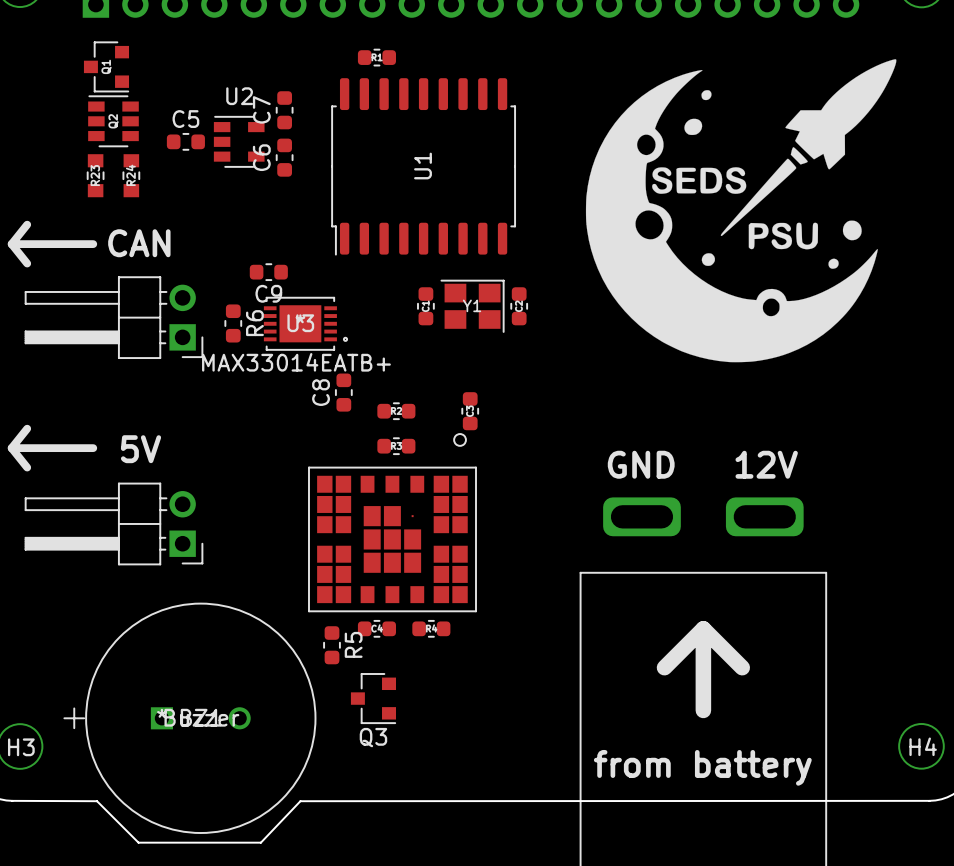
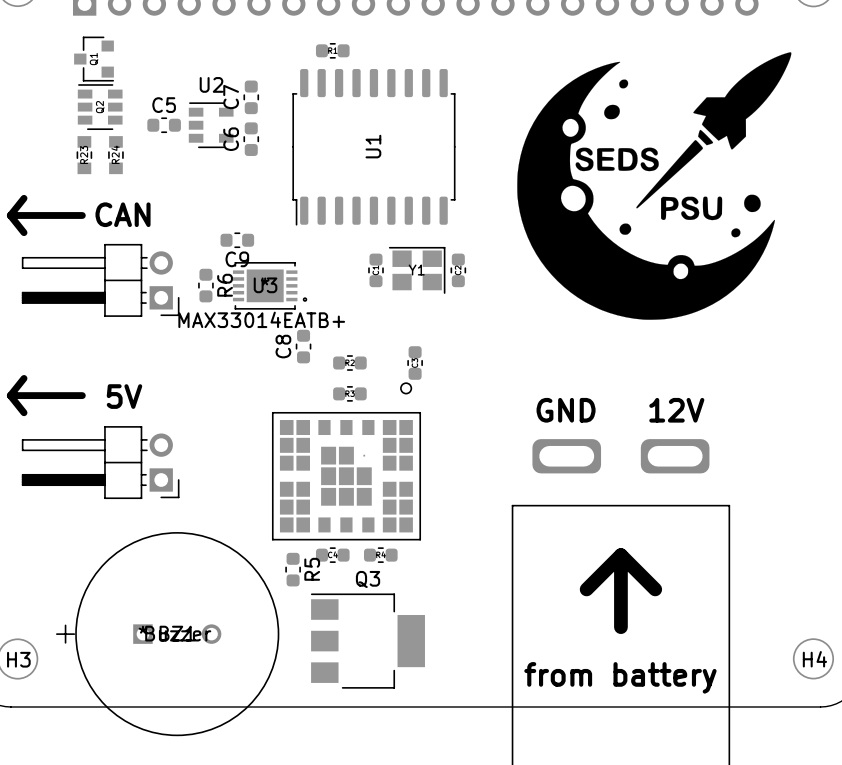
Q3 footprint: [350, 673, 397, 725] -> [310, 593, 425, 689]
Q3 name position: Q3 (373, 737) -> Q3 (368, 579)
board edge: (12, 800) (97, 801) (138, 842) (260, 842) (300, 801) (929, 800) -> (10, 707) (820, 707)

